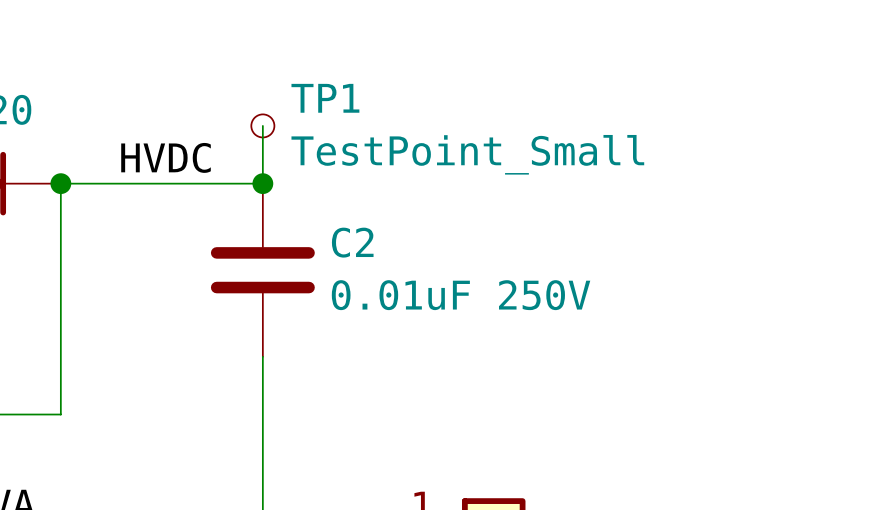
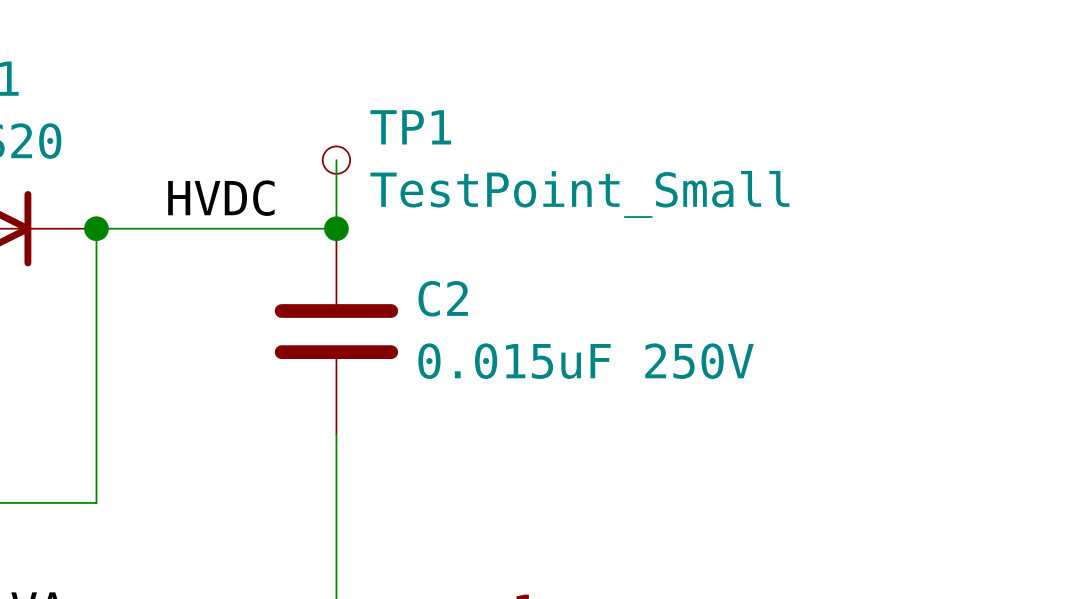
C2 value: 0.01uF 250V (461, 295) -> 0.015uF 250V (586, 361)

